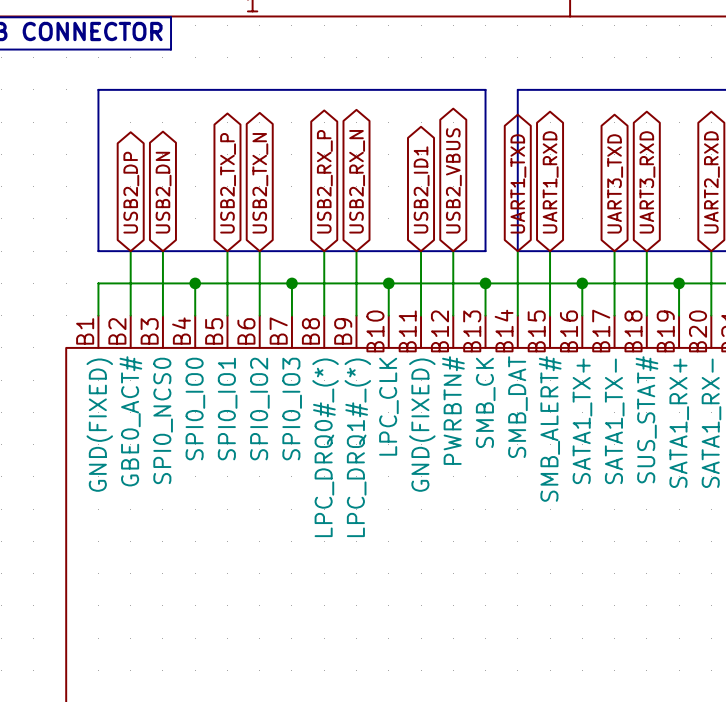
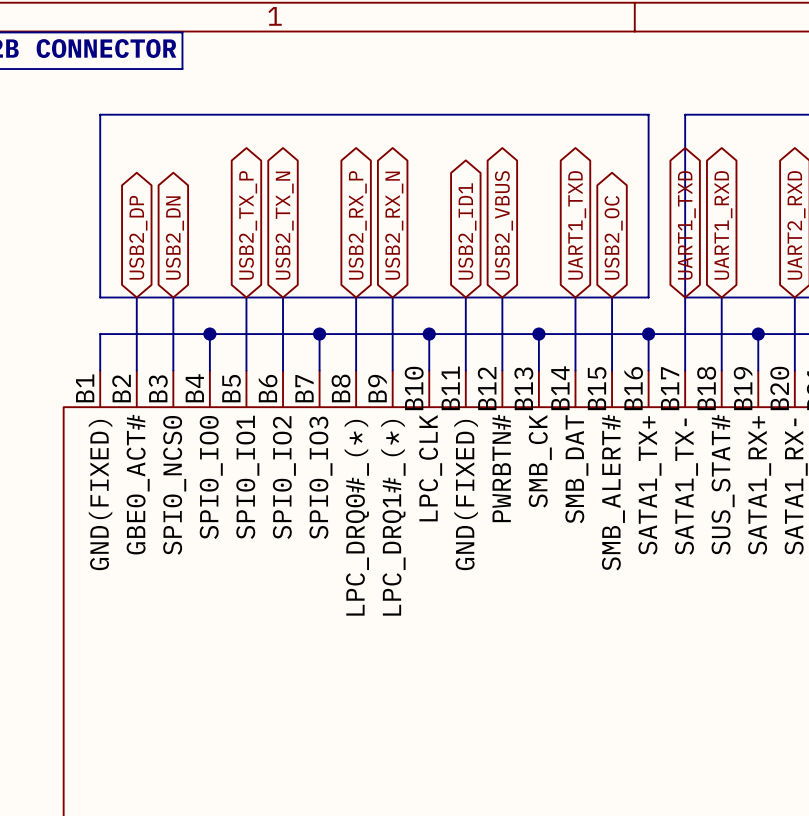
line: (485, 89) (485, 251) -> (538, 114) (575, 114)
line: (517, 89) (517, 251) -> (538, 297) (575, 297)
line: (582, 89) (614, 89) -> (648, 114) (648, 297)
global label: UART1_RXD (550, 182) -> USB2_OC (613, 237)
global label: UART3_RXD (647, 182) -> UART1_RXD (723, 225)
global label: UART3_TXD (615, 183) -> UART1_TXD (686, 225)
line: (582, 251) (614, 251) -> (685, 114) (685, 297)

